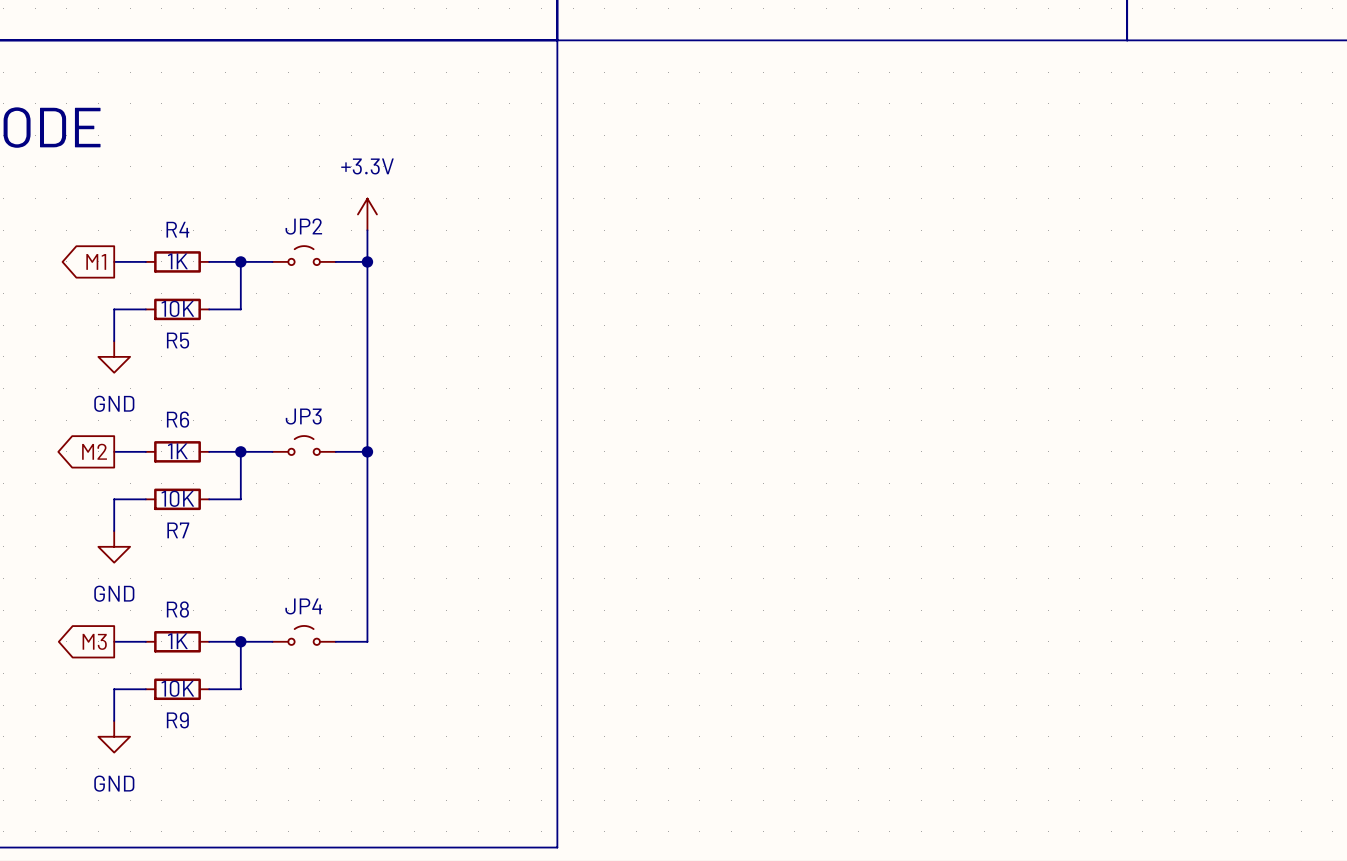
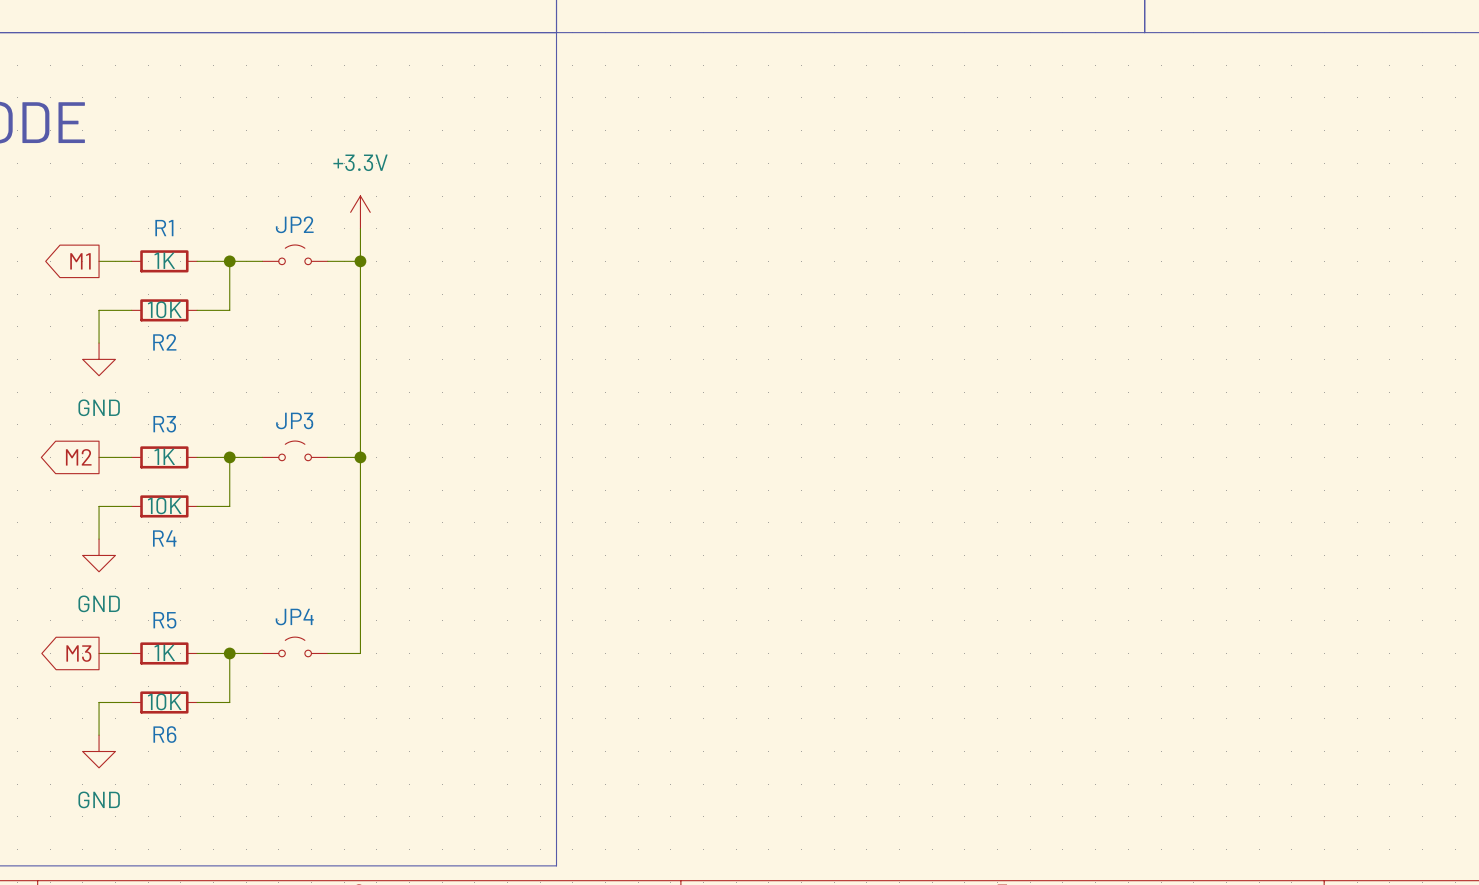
R4 name: R4 (177, 229) -> R1 (164, 228)
R5 name: R5 (178, 340) -> R2 (164, 342)
R6 name: R6 (178, 419) -> R3 (164, 424)
R7 name: R7 (178, 530) -> R4 (164, 538)
R8 name: R8 (177, 609) -> R5 (164, 620)
R9 name: R9 (177, 720) -> R6 (164, 734)

